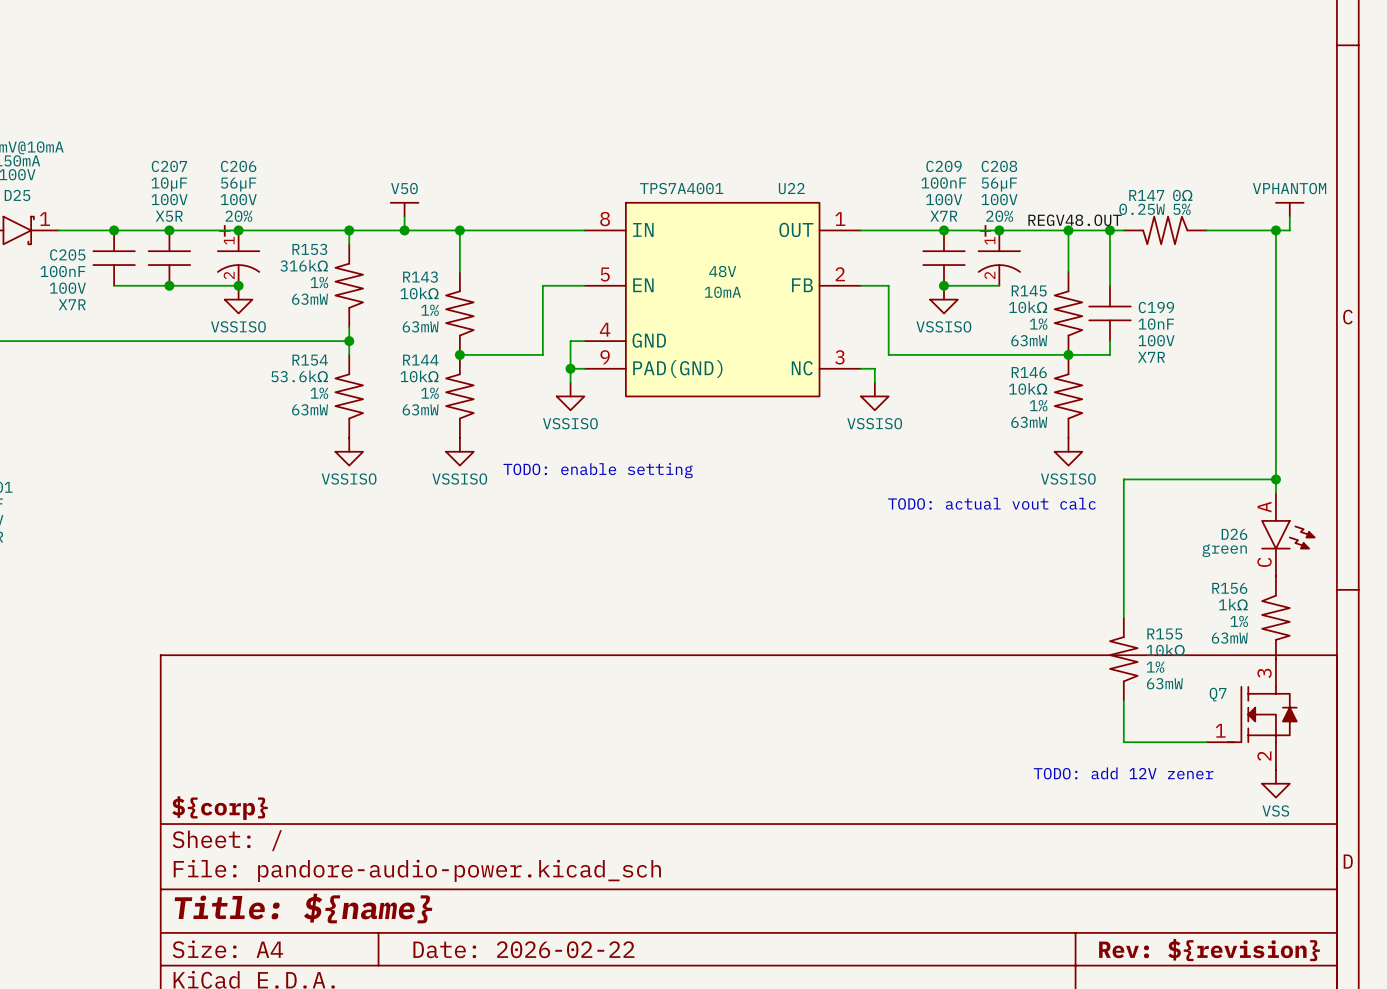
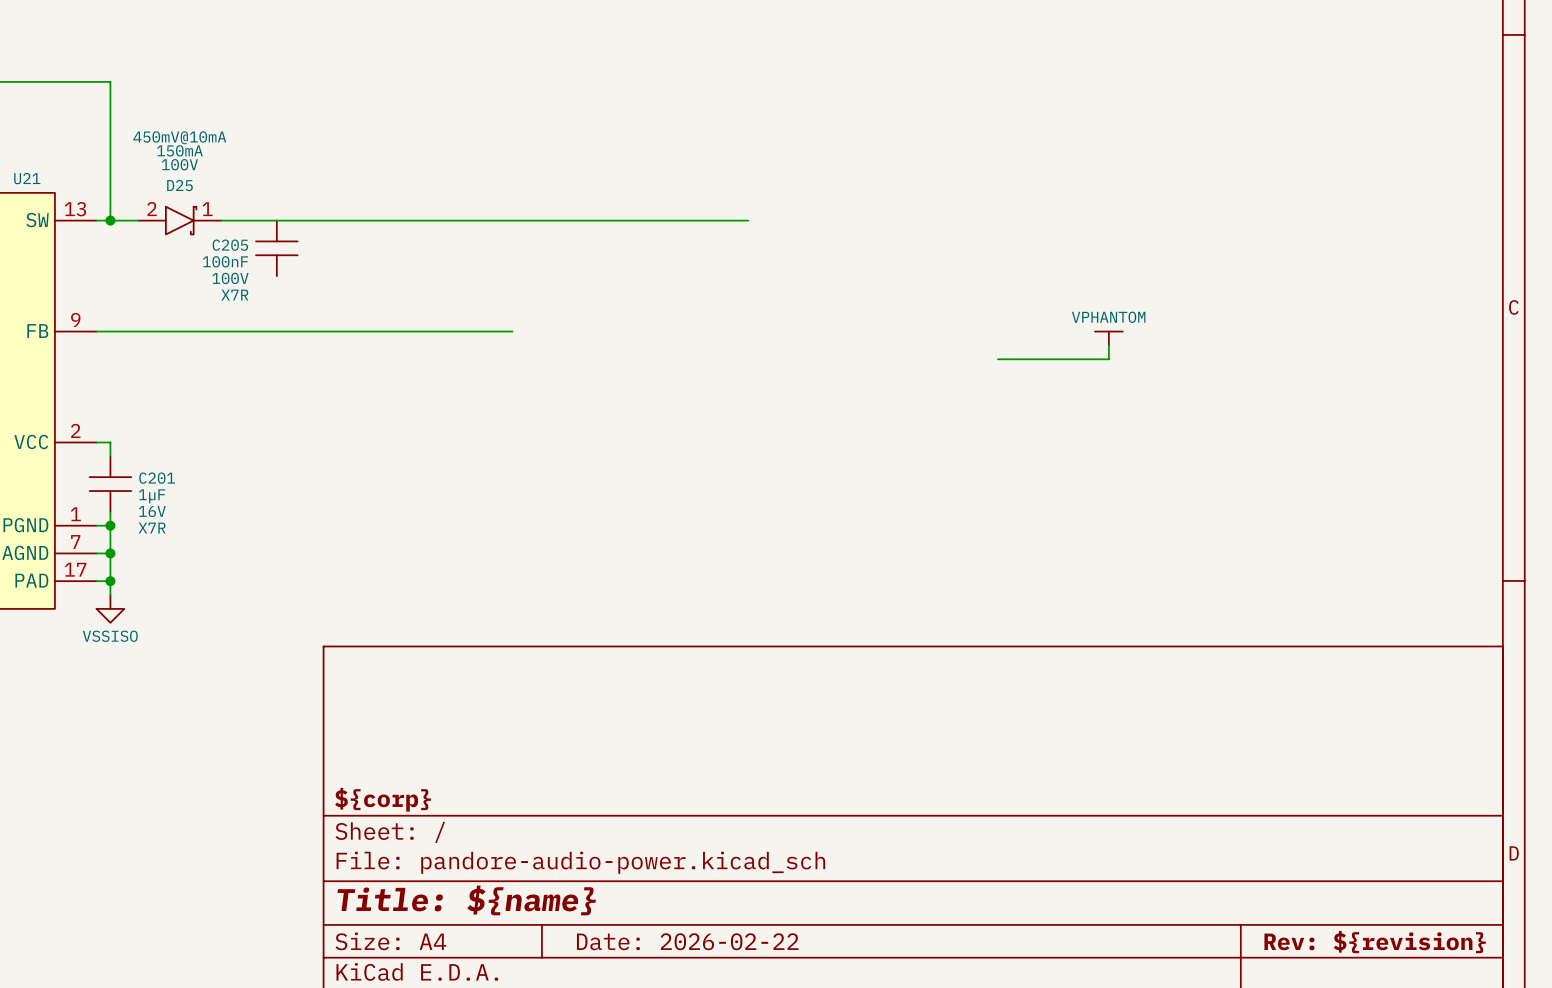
power symbol: V50 (404, 209) -> none
power symbol: VPHANTOM (1289, 209) -> none
wire: (404, 216) (404, 230) -> none
wire: (1289, 216) (1289, 230) (1206, 230) -> none
label: REGV48.OUT (1075, 220) -> none
junction: (114, 230) -> none
junction: (169, 230) -> none
junction: (238, 230) -> none
wire: (349, 230) (349, 244) -> none
junction: (349, 230) -> none
junction: (404, 230) -> none
wire: (459, 230) (459, 271) -> none
junction: (459, 230) -> none
wire: (861, 230) (1123, 230) -> none
junction: (944, 230) -> none
junction: (999, 230) -> none
wire: (1068, 230) (1068, 271) -> none
junction: (1068, 230) -> none
wire: (1109, 230) (1109, 285) -> none
junction: (1109, 230) -> none
R147: (1165, 230) -> none
wire: (1275, 230) (1275, 493) -> none
junction: (1275, 230) -> none
C207: (169, 258) -> none
C206: (238, 258) -> none
C209: (944, 258) -> none
C208: (999, 258) -> none
wire: (114, 285) (238, 285) -> none
junction: (169, 285) -> none
junction: (238, 285) -> none
R153: (349, 285) -> none
wire: (584, 285) (542, 285) (542, 354) (459, 354) -> none
wire: (861, 285) (888, 285) (888, 354) (1109, 354) (1109, 341) -> none
wire: (944, 285) (999, 285) -> none
junction: (944, 285) -> none
power symbol: VSSISO (238, 299) -> none
U22: TPS7A4001 (722, 299) -> none
power symbol: VSSISO (944, 299) -> none
R143: (459, 313) -> none
R145: (1068, 313) -> none
C199: (1109, 313) -> none
wire: (349, 327) (349, 354) -> none
junction: (349, 341) -> none
wire: (584, 341) (570, 341) (570, 382) -> none
power symbol: none -> VPHANTOM (1108, 338)
junction: (459, 354) -> none
junction: (1068, 354) -> none
wire: (570, 368) (584, 368) -> none
junction: (570, 368) -> none
wire: (874, 368) (874, 382) -> (1039, 359) (1108, 359) (1108, 345)
R154: (349, 396) -> none
R144: (459, 396) -> none
power symbol: VSSISO (570, 396) -> none
power symbol: VSSISO (874, 396) -> none
R146: (1068, 396) -> none
power symbol: VSSISO (349, 451) -> none
power symbol: VSSISO (459, 451) -> none
power symbol: VSSISO (1068, 451) -> none
text: TODO: enable setting (598, 470) -> none
wire: (1275, 479) (1123, 479) (1123, 617) -> none
junction: (1275, 479) -> none
text: TODO: actual vout calc (991, 503) -> none
D26: green (1288, 534) -> none
R156: (1275, 617) -> none
R155: (1123, 659) -> none
wire: (1123, 700) (1123, 742) (1206, 742) -> none
Q7: (1251, 714) -> none
text: TODO: add 12V zener (1123, 773) -> none
power symbol: VSS (1275, 783) -> none

